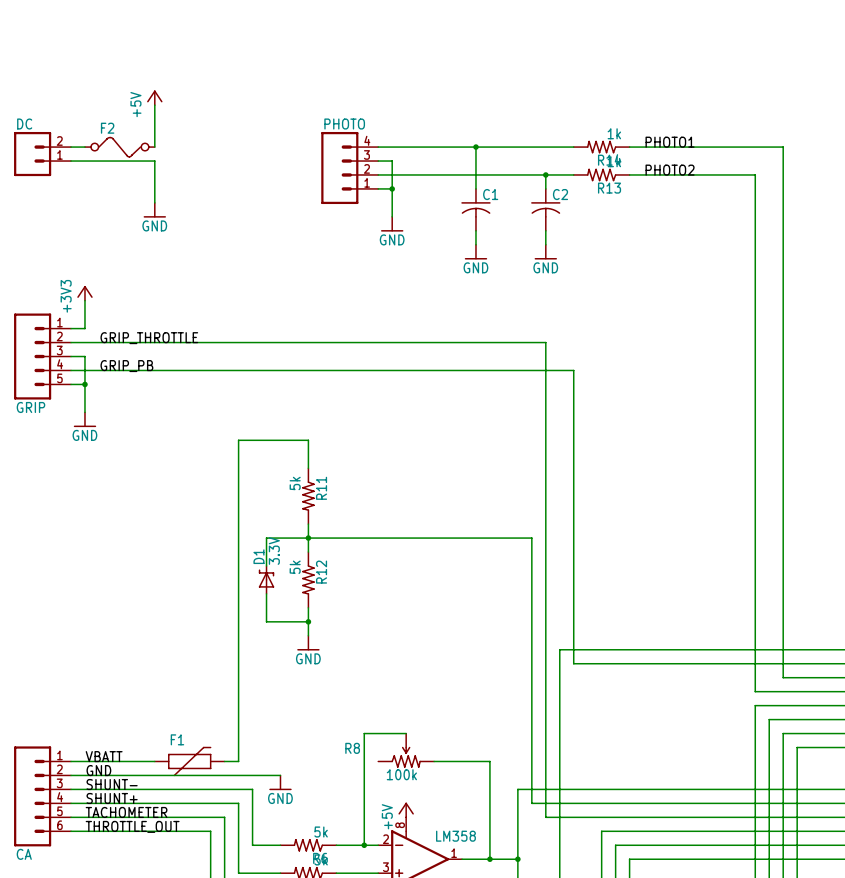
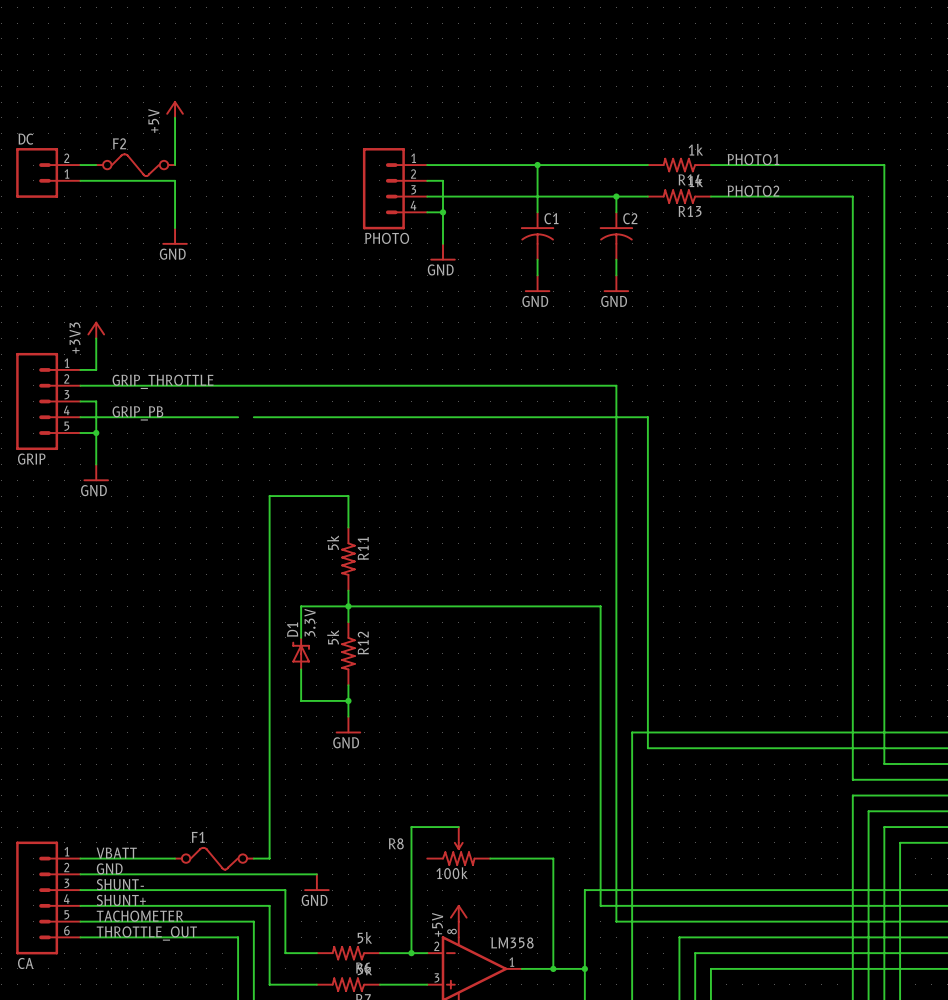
PHOTO flip: as is (339, 168) -> up-down (383, 188)
wire: (210, 370) (224, 370) -> none
F1 symbol: [154, 746, 225, 777] -> [175, 847, 254, 871]

